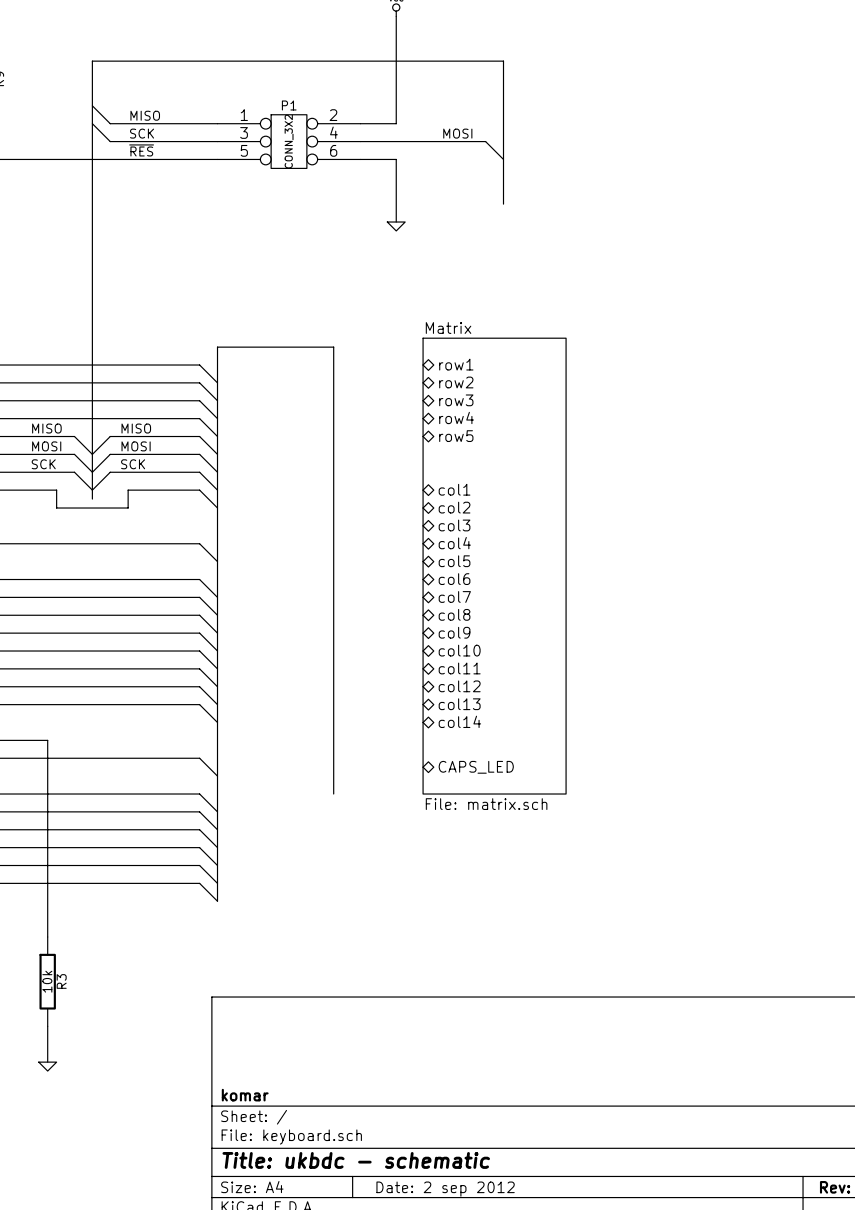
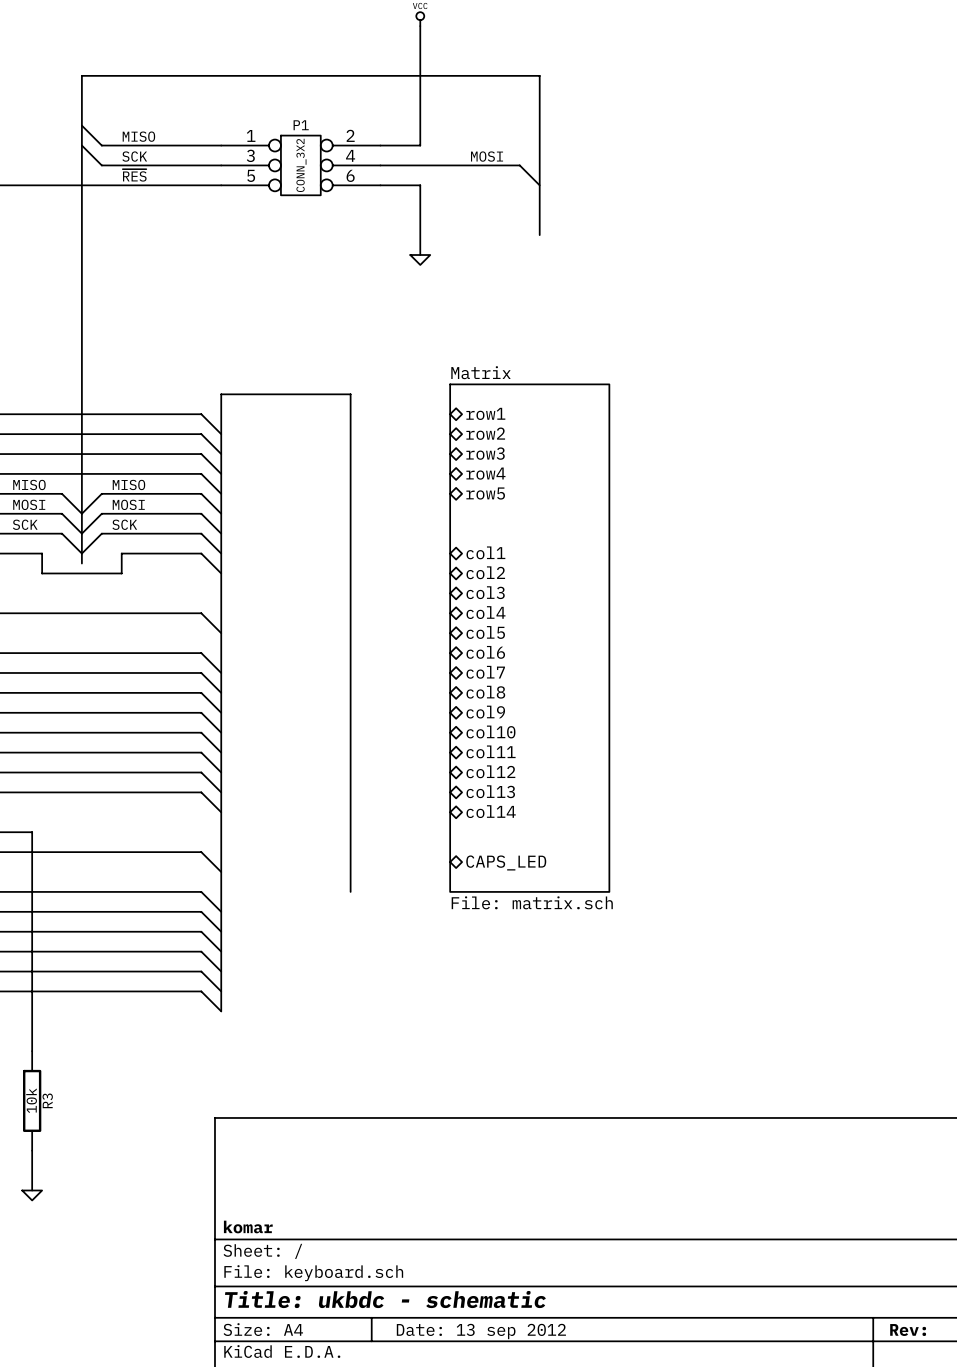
title block: Date: 2 sep 2012 (445, 1189) -> Date: 13 sep 2012 (481, 1331)

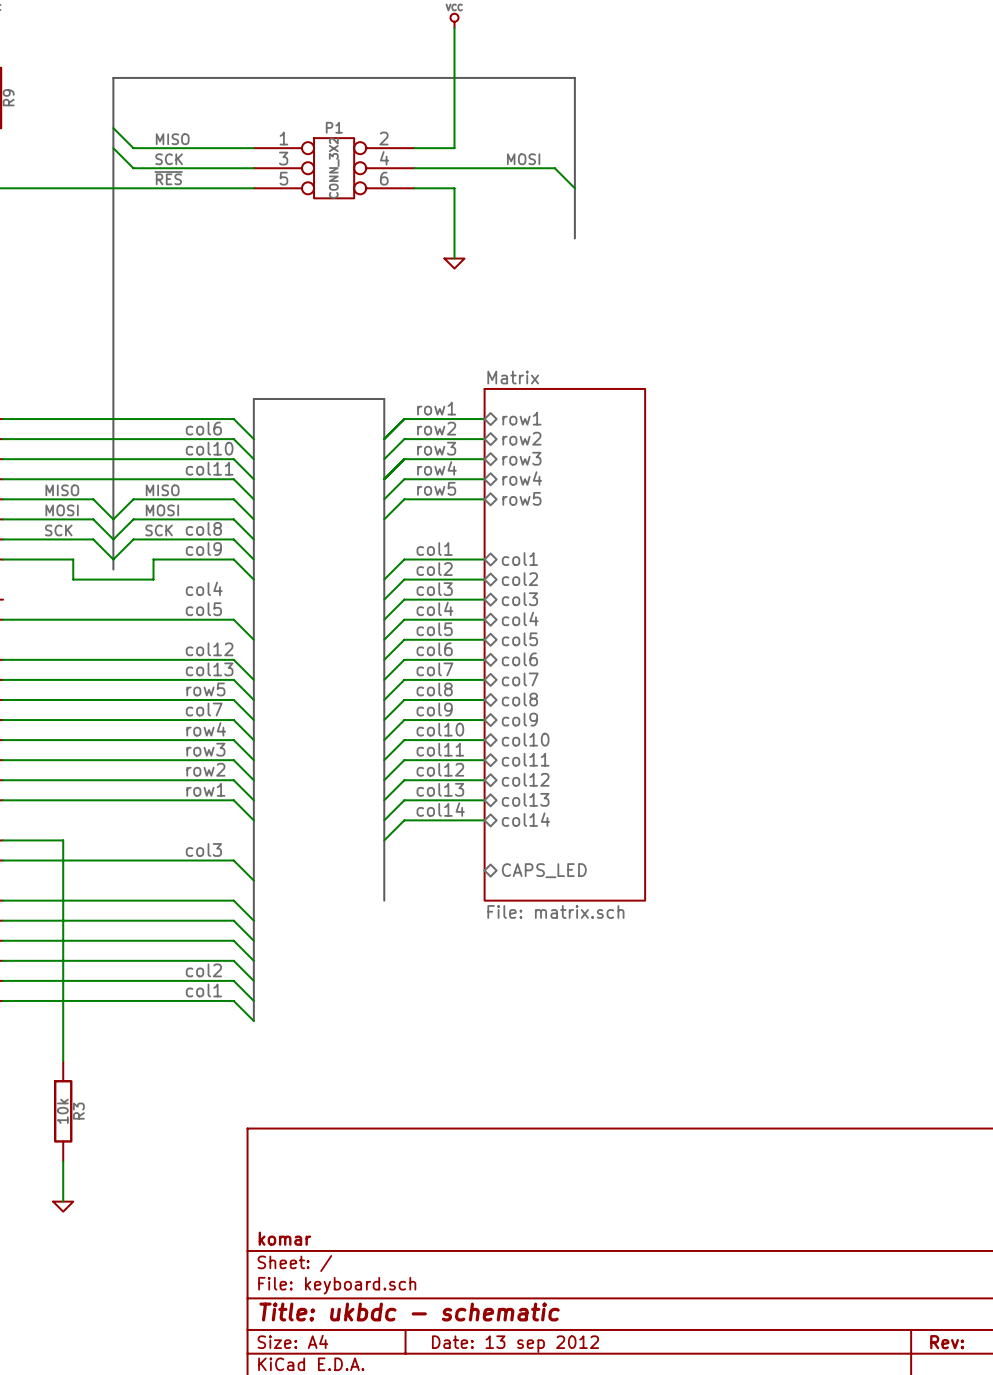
label: none -> row1 (436, 408)
wire: none -> (484, 419) (404, 419) (384, 439)
label: none -> col6 (203, 428)
label: none -> row2 (436, 428)
wire: none -> (484, 439) (404, 439) (384, 459)
label: none -> col10 (209, 448)
label: none -> row3 (436, 448)
wire: none -> (484, 459) (404, 459) (384, 479)
label: none -> col11 (209, 468)
label: none -> row4 (436, 468)
wire: none -> (484, 479) (404, 479) (384, 499)
label: none -> row5 (436, 488)
wire: none -> (484, 499) (404, 499) (384, 519)
label: none -> col8 (203, 528)
label: none -> col9 (203, 549)
label: none -> col1 (434, 549)
wire: none -> (484, 559) (404, 559) (384, 579)
label: none -> col2 (434, 569)
wire: none -> (484, 579) (404, 579) (384, 599)
label: none -> col4 (204, 588)
label: none -> col3 (434, 589)
wire: none -> (484, 599) (404, 599) (384, 619)
label: none -> col5 (203, 609)
label: none -> col4 (434, 608)
wire: none -> (484, 619) (404, 619) (384, 639)
label: none -> col5 (434, 629)
wire: none -> (484, 639) (404, 639) (384, 659)
label: none -> col12 (209, 649)
label: none -> col6 (434, 649)
wire: none -> (484, 659) (404, 659) (384, 679)
label: none -> col13 (209, 669)
label: none -> col7 (434, 669)
wire: none -> (484, 679) (404, 679) (384, 699)
label: none -> row5 (205, 689)
label: none -> col8 (434, 689)
wire: none -> (484, 699) (404, 699) (384, 720)
label: none -> col7 (204, 709)
label: none -> col9 (434, 709)
wire: none -> (484, 720) (404, 720) (384, 740)
label: none -> row4 (206, 729)
label: none -> col10 (440, 729)
wire: none -> (484, 740) (404, 740) (384, 760)
label: none -> col11 (440, 749)
label: none -> row3 (205, 749)
wire: none -> (484, 760) (404, 760) (384, 780)
label: none -> col12 (440, 769)
label: none -> row2 (205, 769)
wire: none -> (484, 780) (404, 780) (384, 800)
label: none -> col13 (440, 789)
label: none -> row1 (205, 789)
wire: none -> (484, 800) (404, 800) (384, 820)
label: none -> col14 (440, 809)
wire: none -> (484, 820) (404, 820) (384, 840)
label: none -> col3 (203, 850)
label: none -> col2 (203, 970)
label: none -> col1 (203, 990)

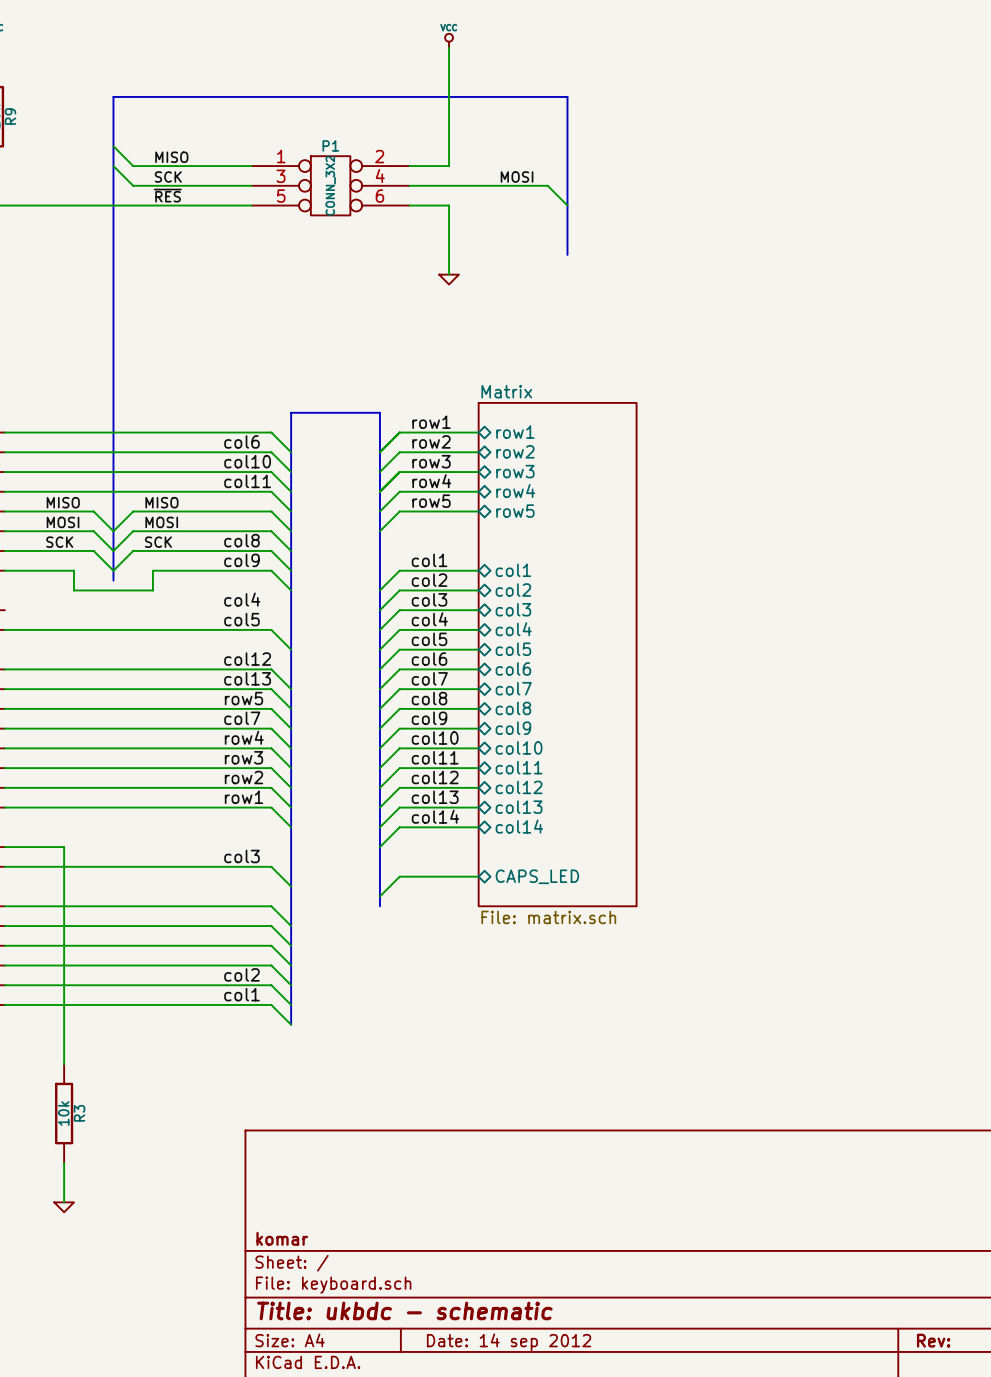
bus: (293, 398) (253, 398) (253, 1021) -> (291, 412) (291, 1024)
wire: (233, 419) (253, 439) -> (231, 432) (271, 432) (291, 452)
label position: col6 (203, 428) -> col6 (242, 441)
wire: (233, 439) (253, 459) -> (231, 452) (271, 452) (291, 472)
label position: col10 (209, 448) -> col10 (247, 461)
wire: (233, 459) (253, 479) -> (231, 472) (271, 472) (291, 491)
label position: col11 (209, 468) -> col11 (247, 481)
wire: (233, 479) (253, 499) -> (231, 491) (271, 491) (291, 511)
wire: (233, 499) (253, 519) -> (231, 511) (271, 511) (291, 531)
wire: (233, 519) (253, 539) -> (231, 531) (271, 531) (291, 550)
label position: col8 (203, 528) -> col8 (242, 540)
wire: (233, 539) (253, 559) -> (231, 550) (271, 550) (291, 570)
label position: col9 (203, 549) -> col9 (242, 560)
wire: (233, 559) (253, 579) -> (231, 570) (271, 570) (291, 590)
label position: col4 (204, 588) -> col4 (242, 599)
label position: col5 (203, 609) -> col5 (242, 619)
wire: (233, 619) (253, 639) -> (231, 629) (271, 629) (291, 649)
label position: col12 (209, 649) -> col12 (247, 659)
wire: (233, 659) (253, 679) -> (231, 669) (271, 669) (291, 689)
label position: col13 (209, 669) -> col13 (247, 678)
wire: (233, 679) (253, 699) -> (231, 689) (271, 689) (291, 708)
label position: row5 (205, 689) -> row5 (243, 698)
wire: (233, 699) (253, 720) -> (231, 708) (271, 708) (291, 728)
label position: col7 (204, 709) -> col7 (242, 718)
wire: (233, 720) (253, 740) -> (231, 728) (271, 728) (291, 748)
label position: row4 (206, 729) -> row4 (244, 737)
wire: (233, 740) (253, 760) -> (231, 748) (271, 748) (291, 768)
label position: row3 (205, 749) -> row3 (243, 757)
wire: (233, 760) (253, 780) -> (231, 768) (271, 768) (291, 787)
label position: row2 (205, 769) -> row2 (243, 777)
wire: (233, 780) (253, 800) -> (231, 787) (271, 787) (291, 807)
label position: row1 (205, 789) -> row1 (243, 797)
wire: (233, 800) (253, 820) -> (231, 807) (271, 807) (291, 827)
label position: col3 (203, 850) -> col3 (242, 856)
wire: (233, 860) (253, 880) -> (231, 866) (271, 866) (291, 886)
wire: none -> (478, 876) (399, 876) (379, 896)
wire: (233, 900) (253, 920) -> (231, 906) (271, 906) (291, 926)
wire: (233, 920) (253, 940) -> (231, 926) (271, 926) (291, 945)
wire: (233, 940) (253, 960) -> (231, 945) (271, 945) (291, 965)
wire: (233, 960) (253, 980) -> (231, 965) (271, 965) (291, 985)
label position: col2 (203, 970) -> col2 (242, 974)
wire: (233, 980) (253, 1000) -> (231, 985) (271, 985) (291, 1004)
label position: col1 (203, 990) -> col1 (242, 994)
wire: (233, 1000) (253, 1021) -> (231, 1004) (271, 1004) (291, 1024)
title block: Date: 13 sep 2012 (515, 1344) -> Date: 14 sep 2012 (509, 1342)

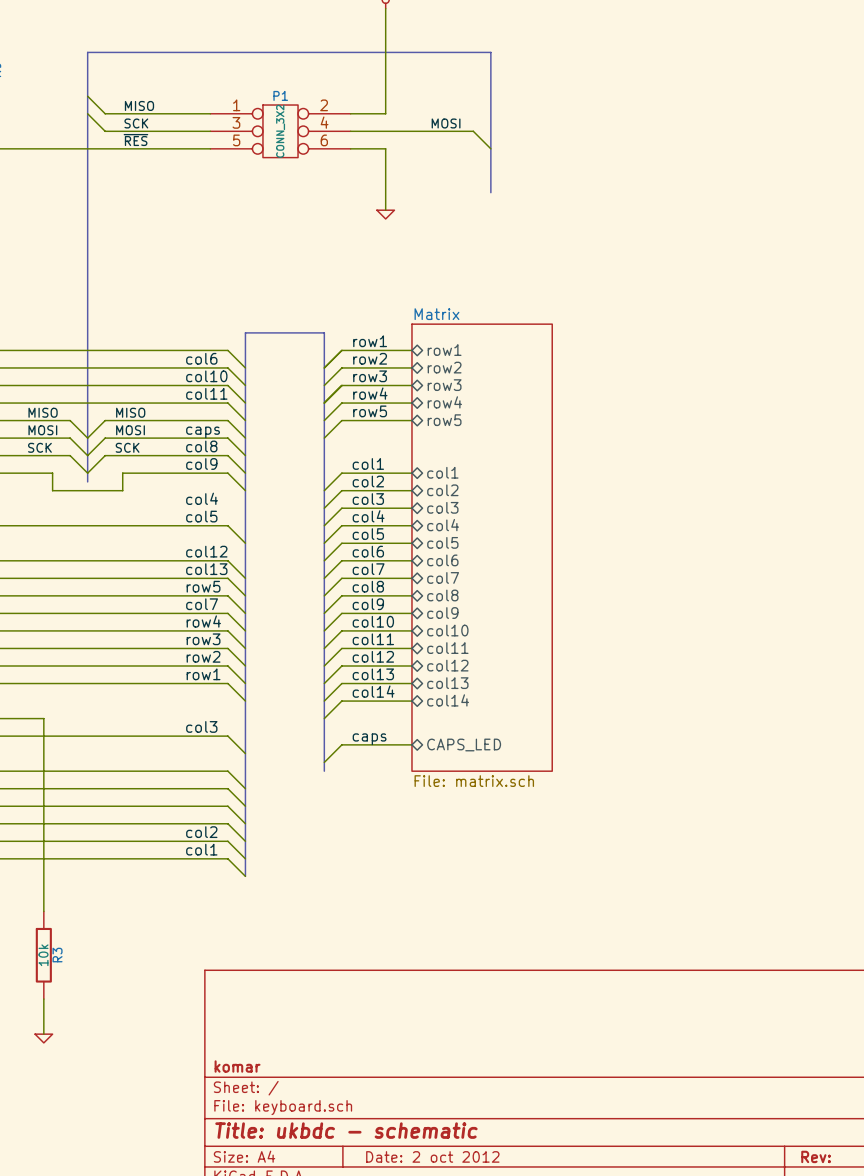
label: none -> caps (203, 432)
label: none -> caps (369, 739)
title block: Date: 14 sep 2012 (509, 1342) -> Date: 2 oct 2012 (432, 1156)

